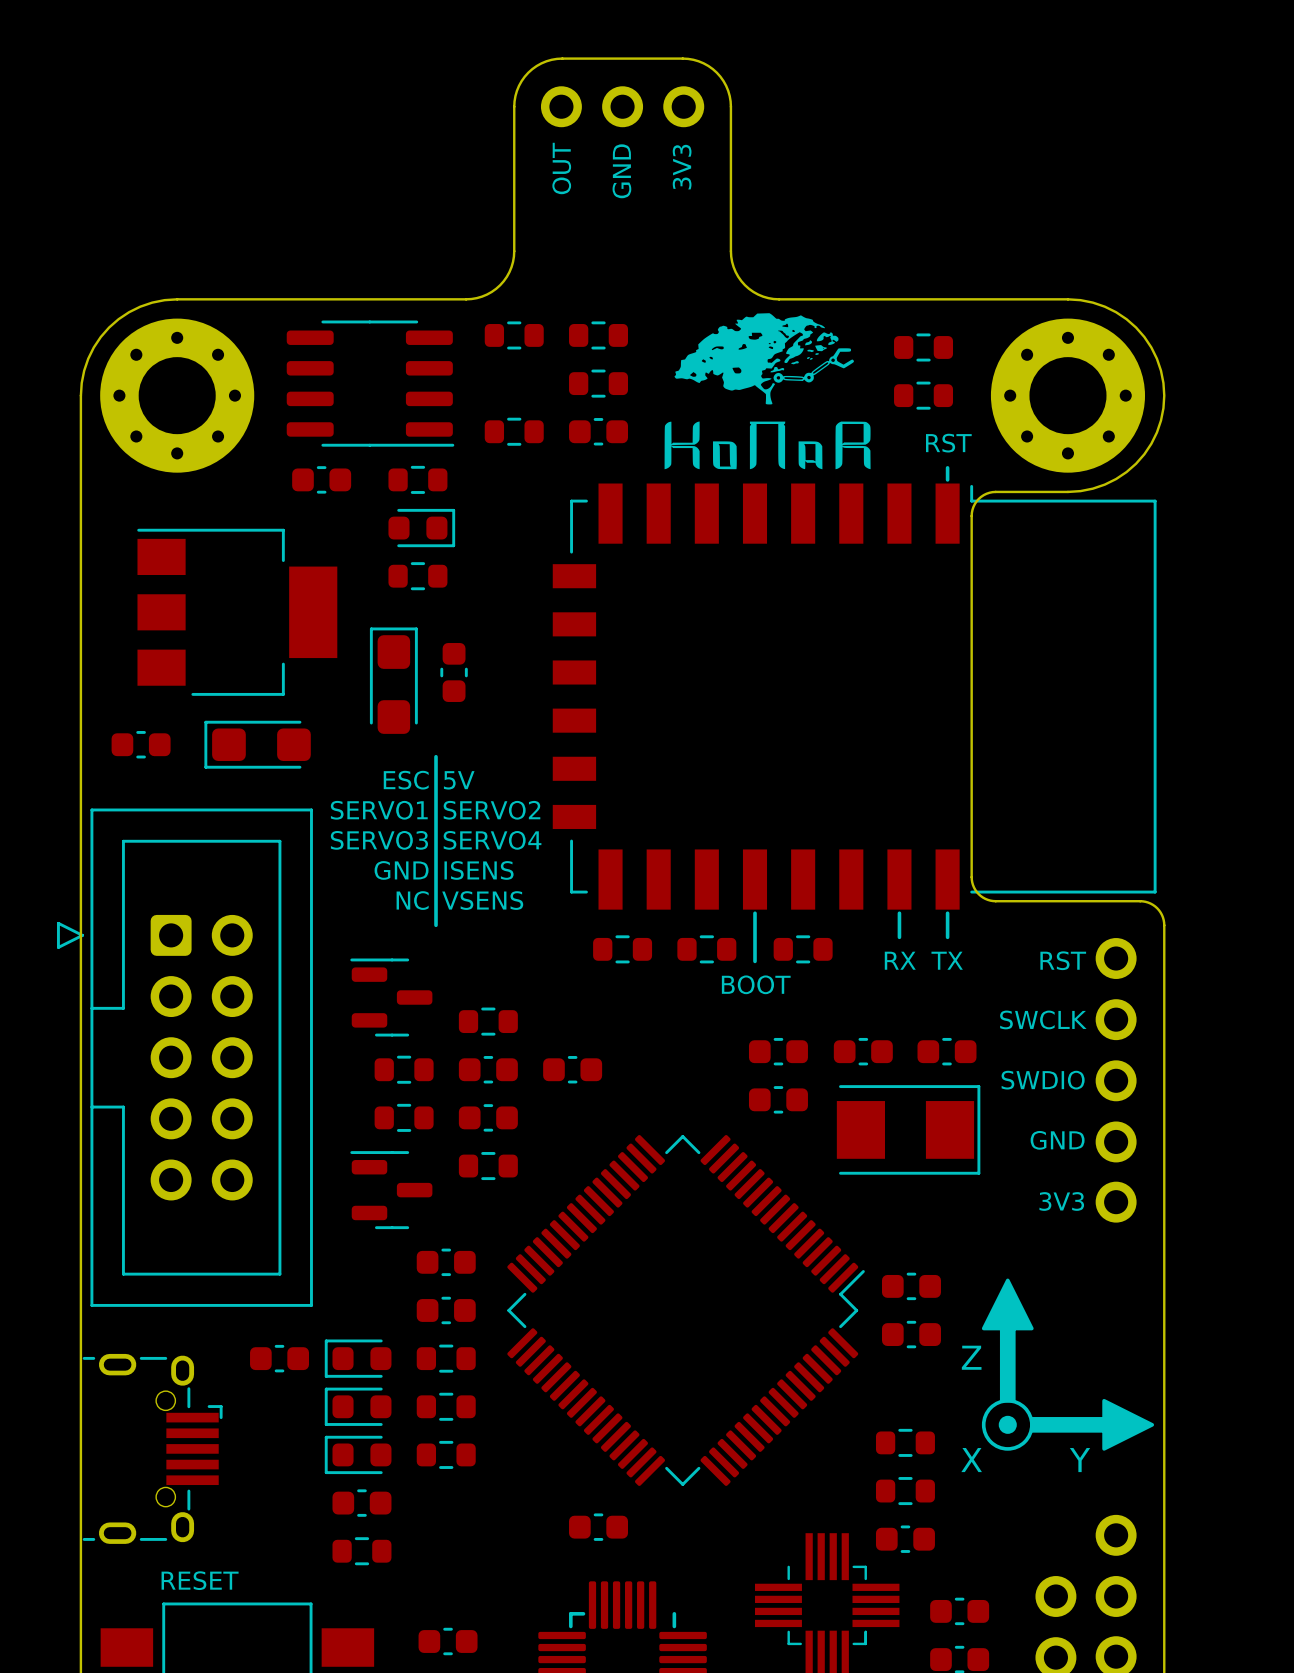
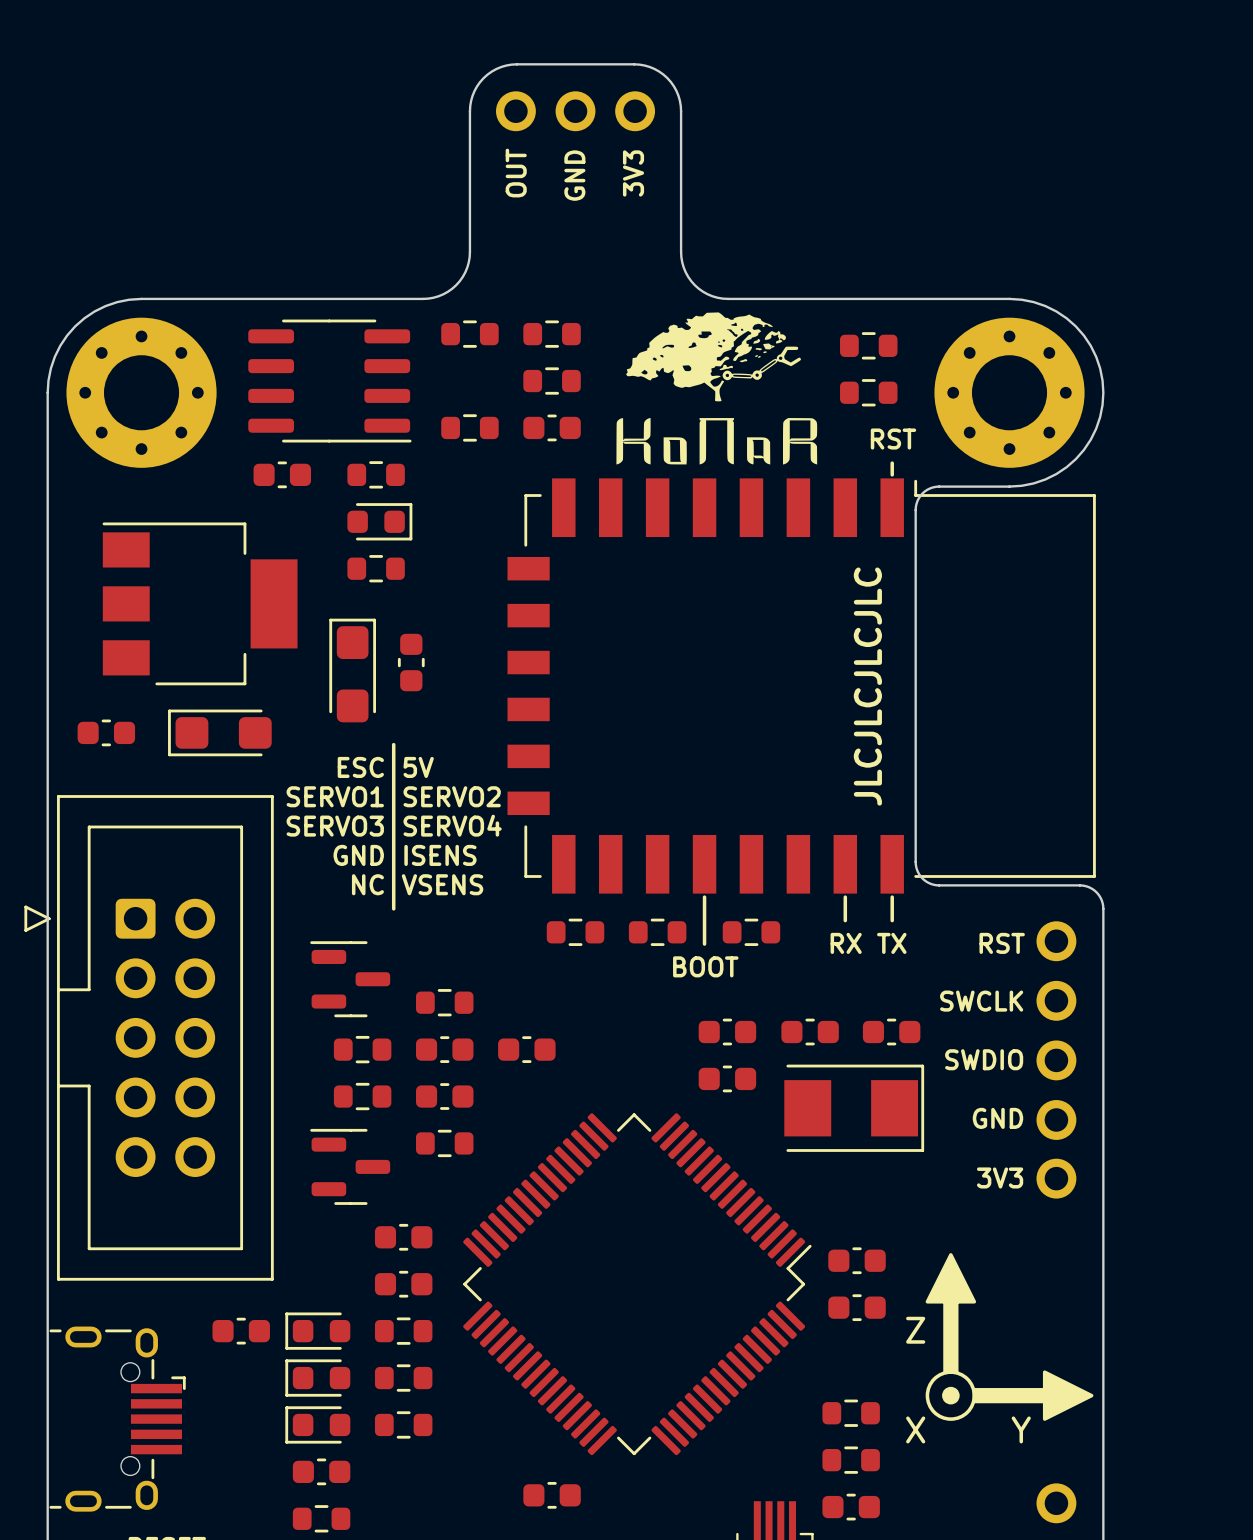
text: none -> JLCJLCJLCJLC (867, 686)

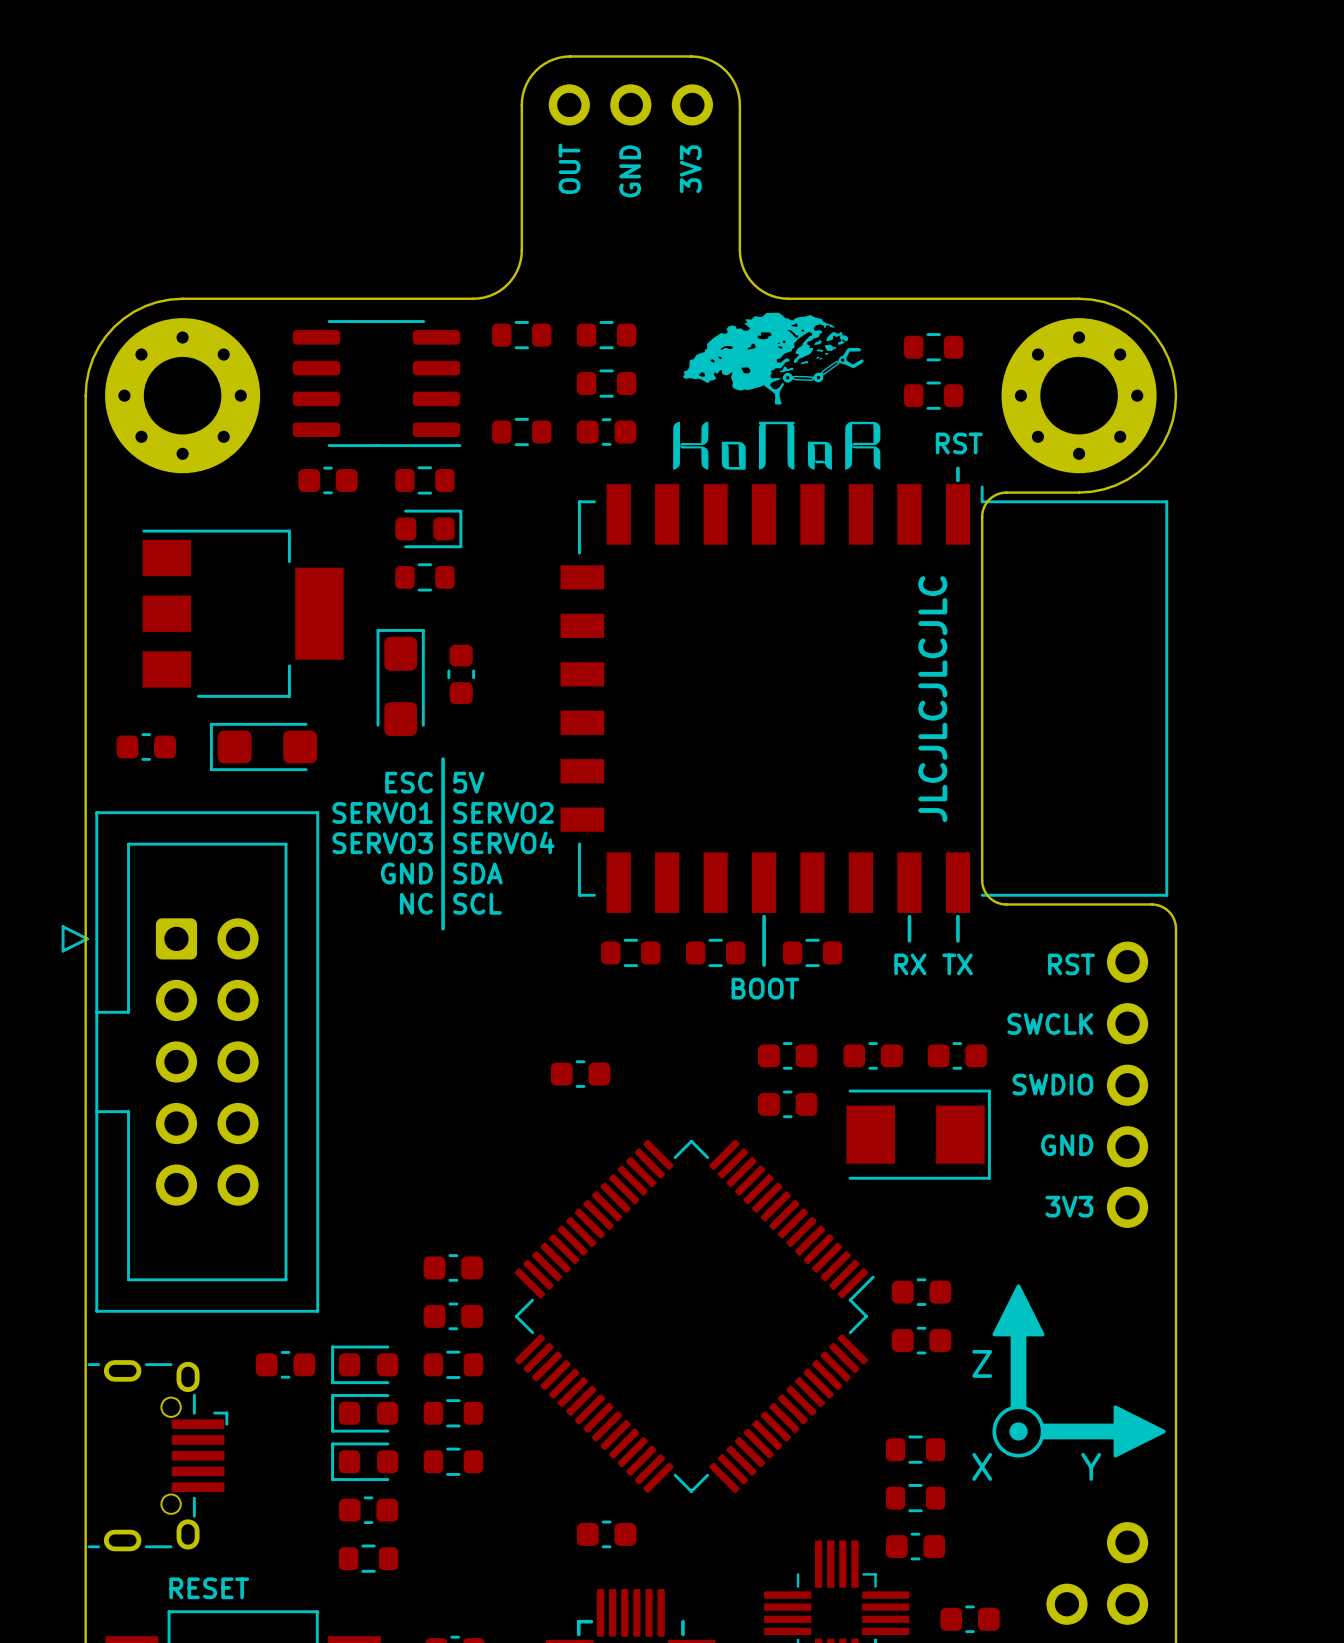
text: ISENS (440, 855) -> SDA (477, 873)
text: VSENS (442, 884) -> SCL (477, 903)
part: (350, 979) -> none
part: (444, 1002) -> none
part: (362, 1049) -> none
part: (444, 1049) -> none
part: (362, 1096) -> none
part: (444, 1096) -> none
part: (444, 1143) -> none
part: (350, 1166) -> none

